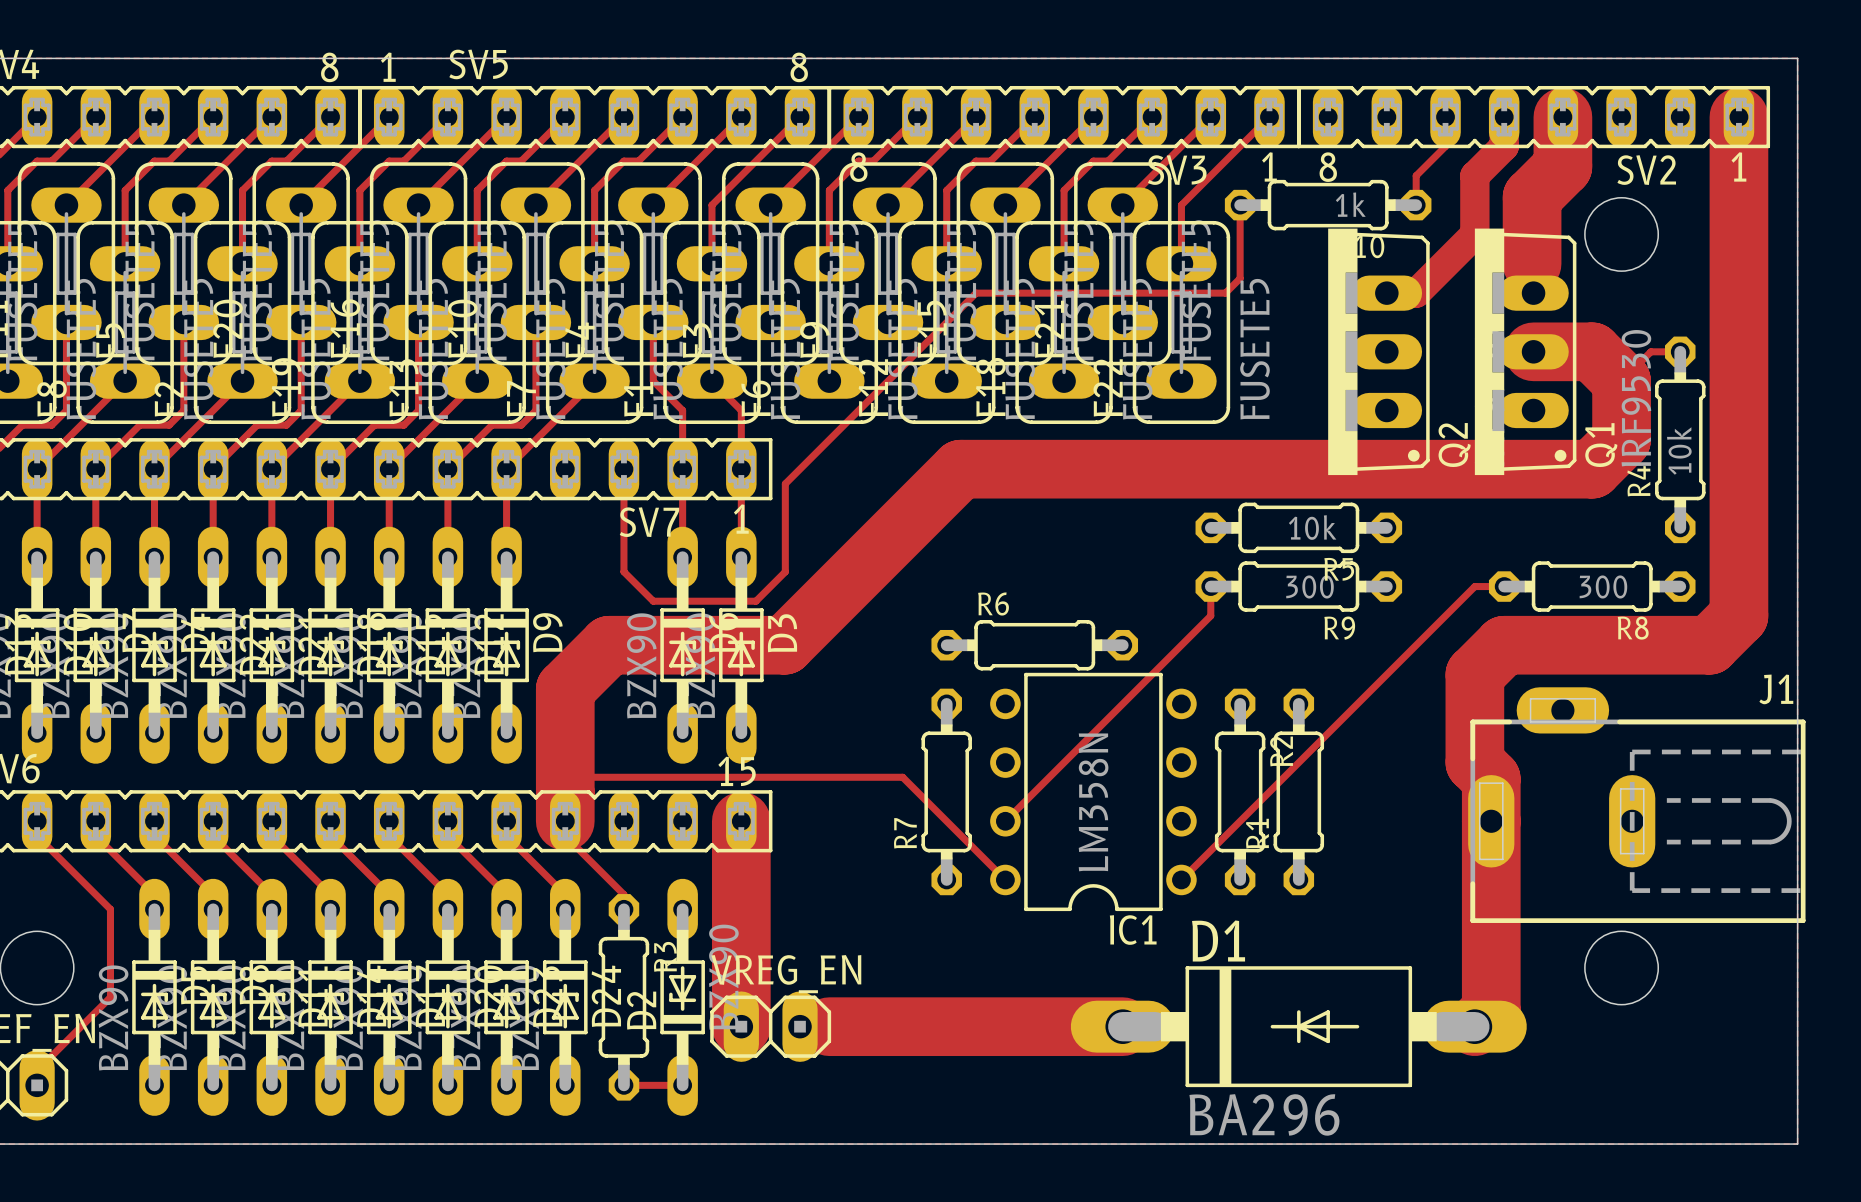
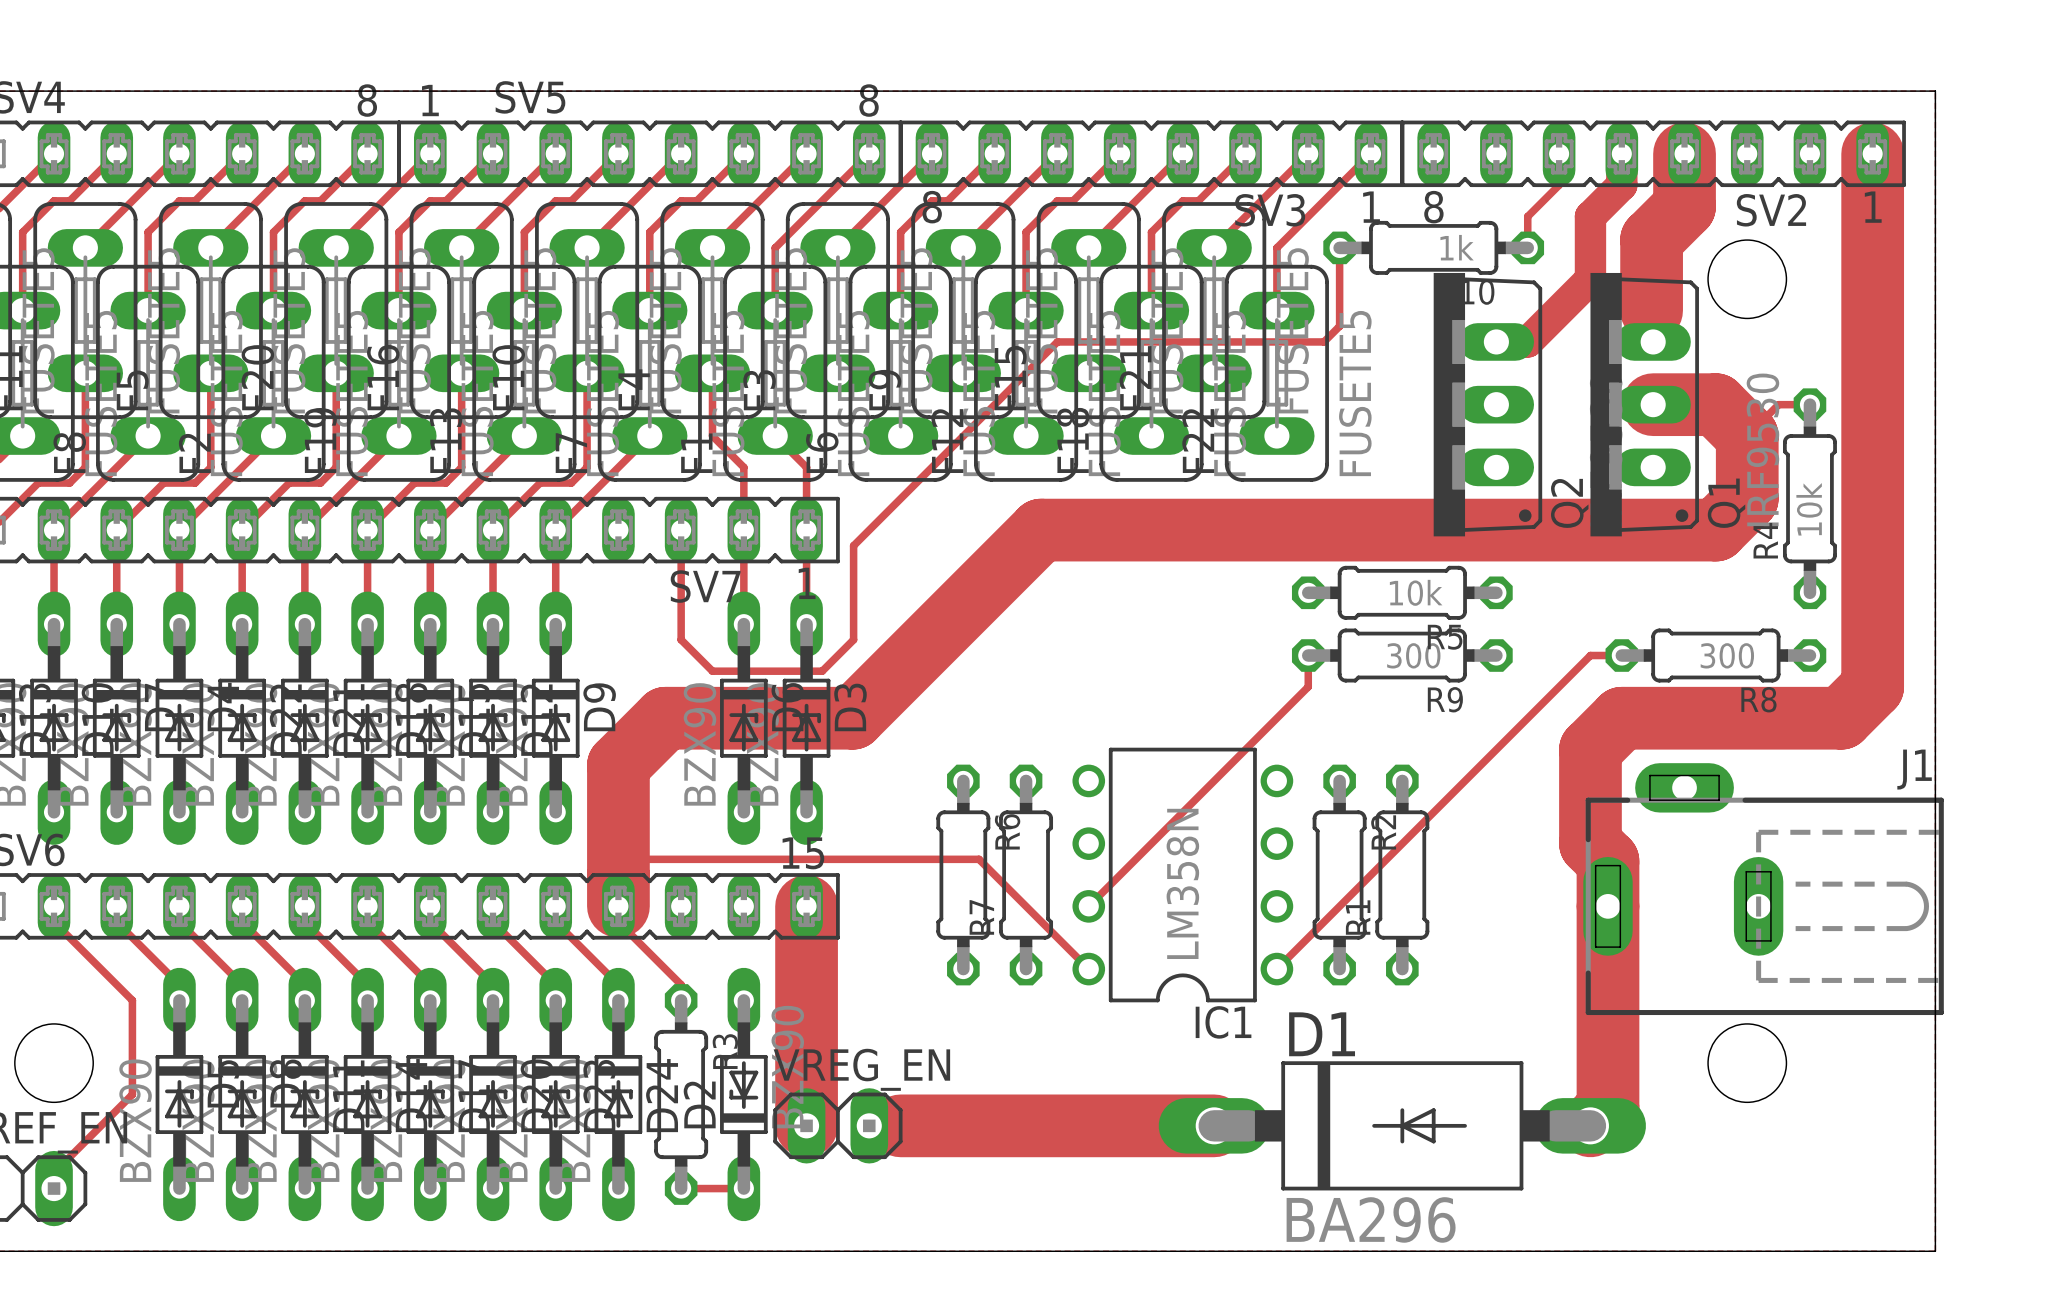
R6 rotation: 0° (1034, 645) -> 90° clockwise (963, 875)
R6 position: (1034, 645) -> (963, 875)

